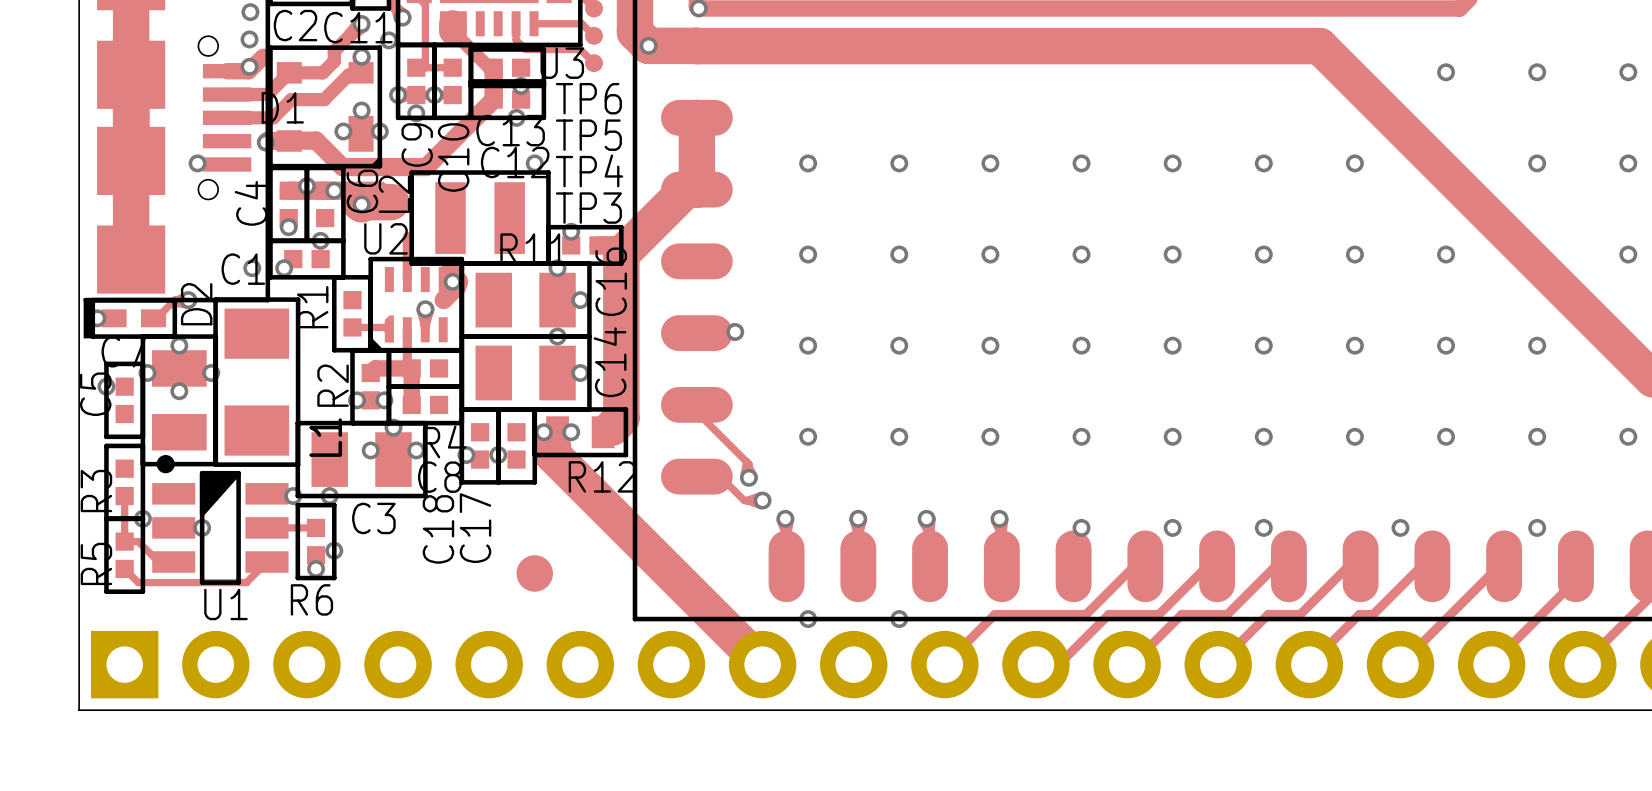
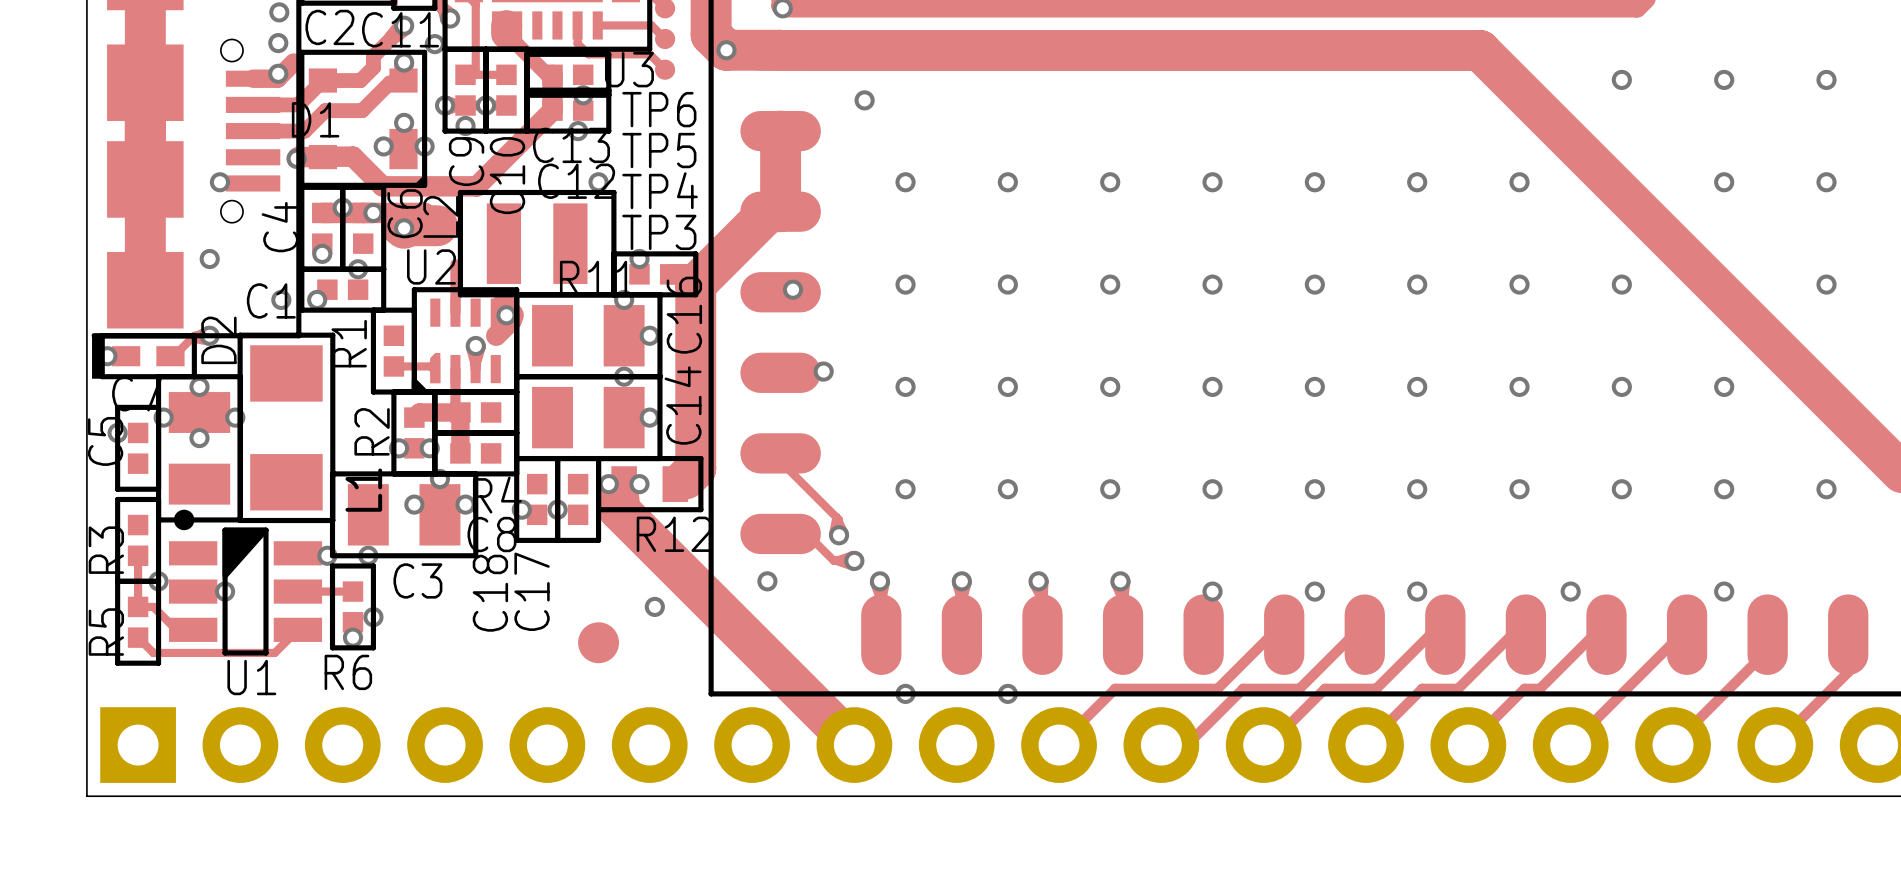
via: none -> (864, 100)
via: none -> (209, 259)
via: none -> (792, 289)
via: none -> (767, 581)
via: none -> (654, 606)

